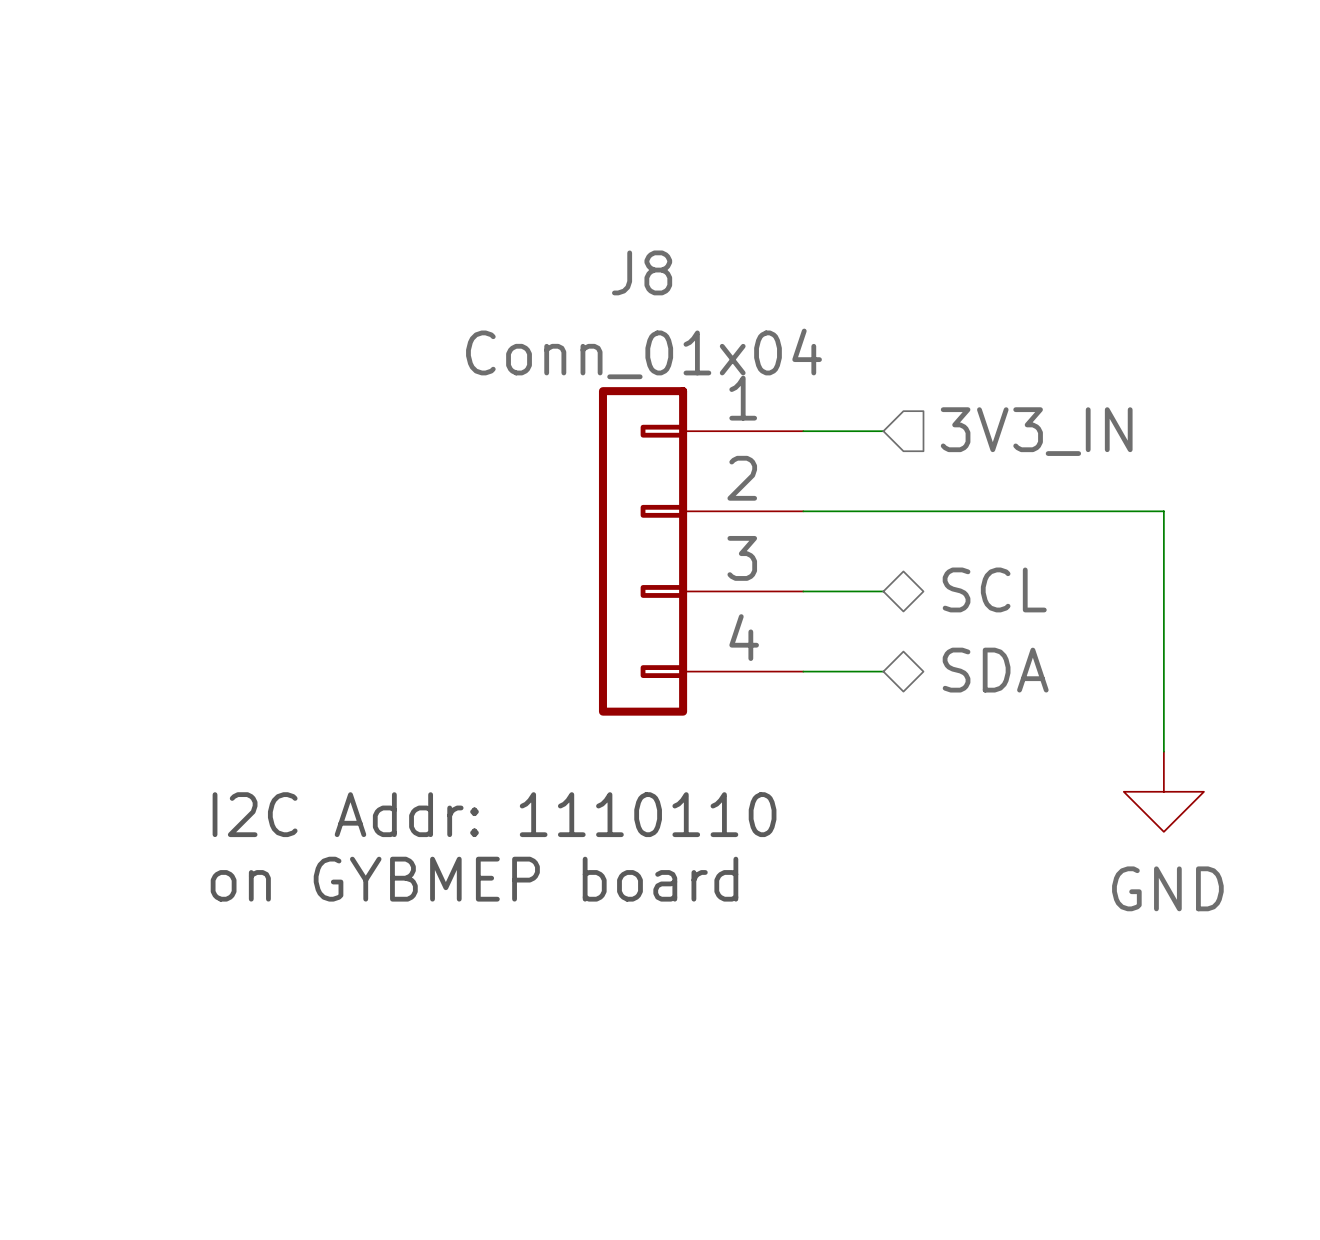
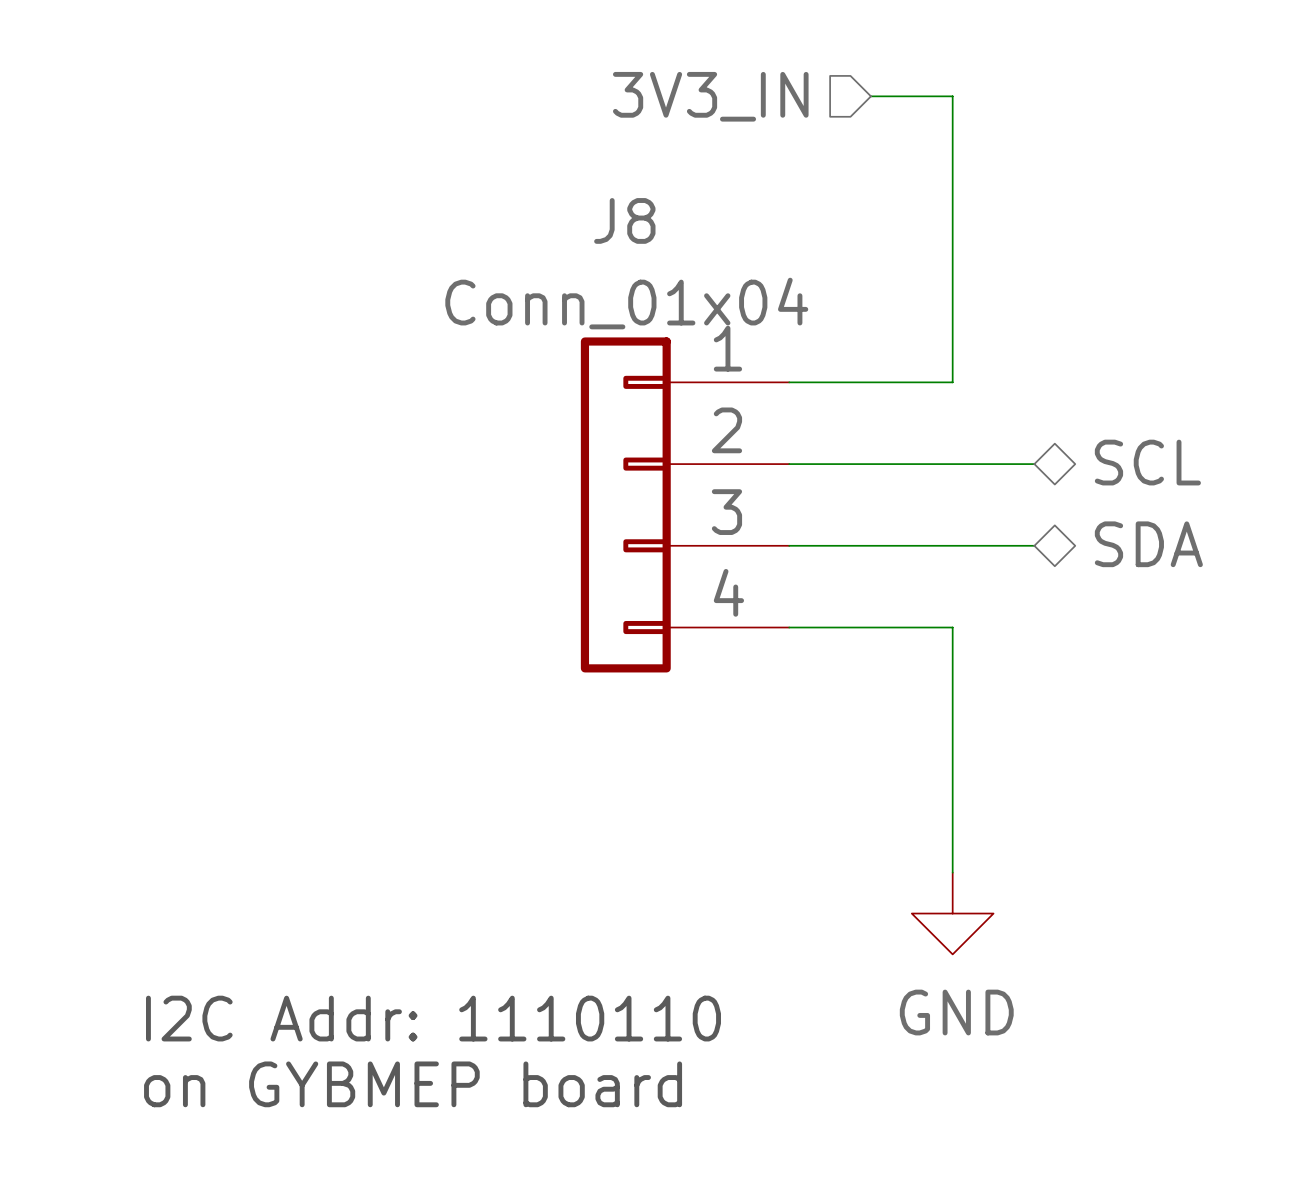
wire: none -> (870, 96) (952, 96) (952, 382) (870, 382)
hierarchical label rotation: 0° (1036, 431) -> 180° (710, 96)
hierarchical label position: 3V3_IN (1036, 431) -> 3V3_IN (710, 96)
wire: (1043, 511) (1163, 511) (1163, 751) -> none
hierarchical label position: SCL (994, 589) -> SCL (1147, 462)
wire: none -> (870, 545) (1034, 545)
hierarchical label position: SDA (995, 670) -> SDA (1148, 544)
wire: none -> (870, 627) (952, 627) (952, 872)
power symbol position: GND (1163, 791) -> GND (952, 913)
text position: I2C Addr: 1110110 (494, 814) -> I2C Addr: 1110110 (433, 1018)
text position: on GYBMEP board (474, 879) -> on GYBMEP board (413, 1084)

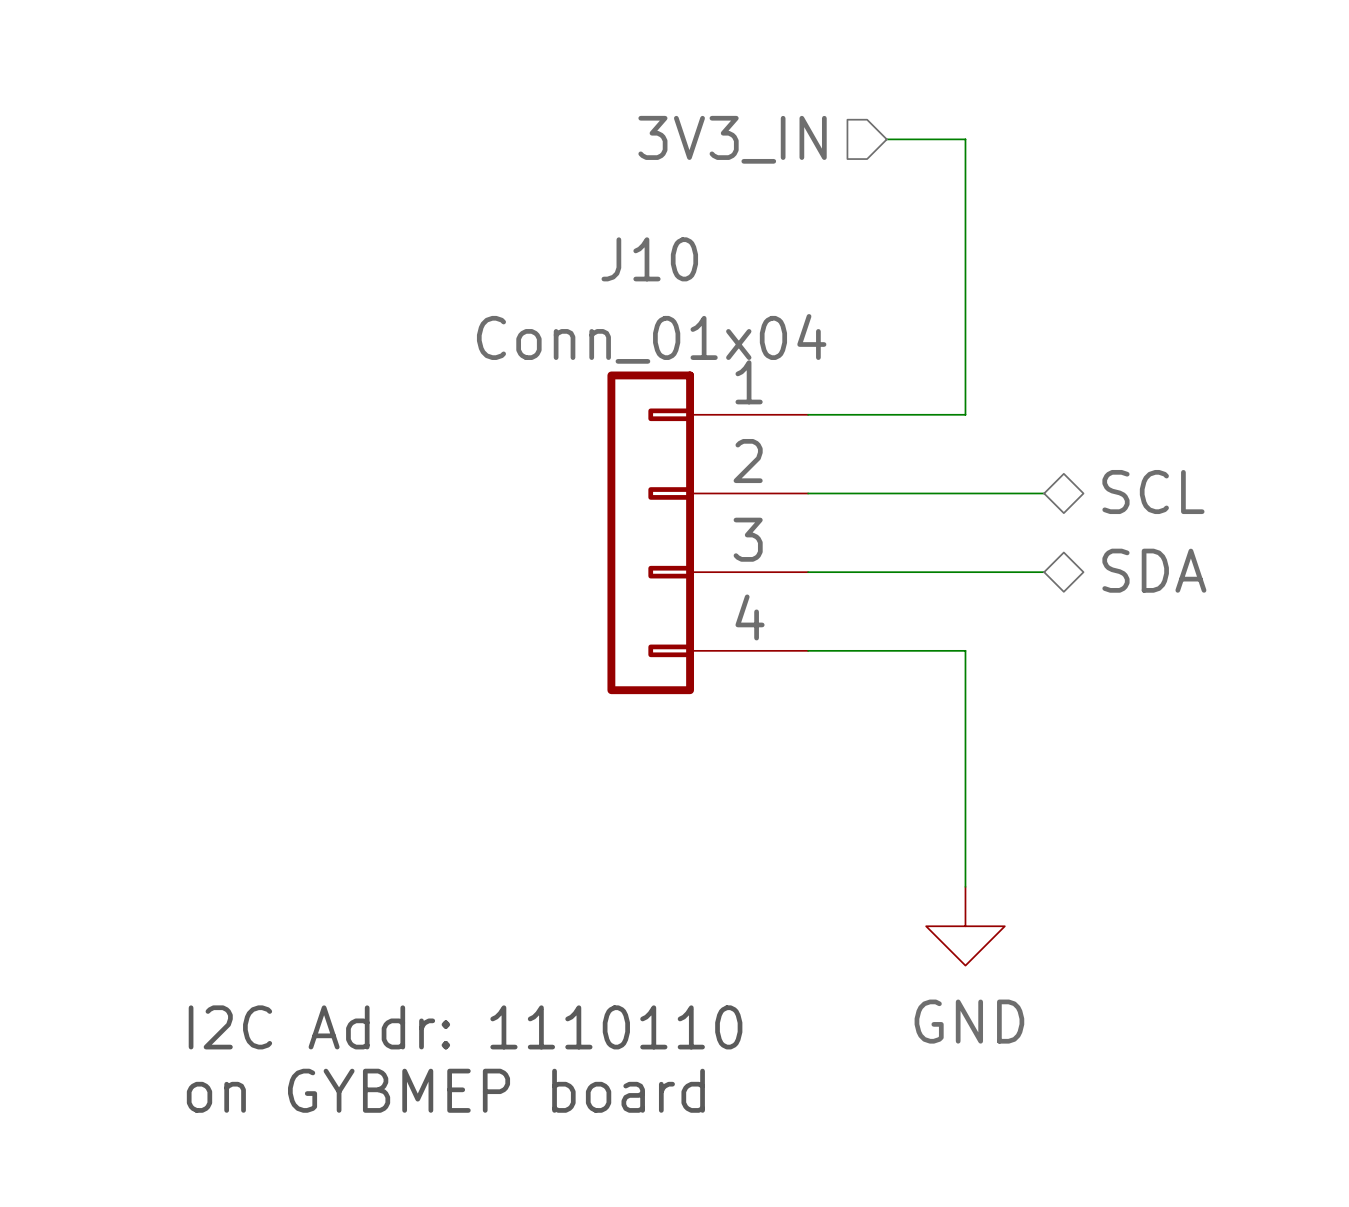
J8 name: J8 (624, 220) -> J10 (649, 259)

